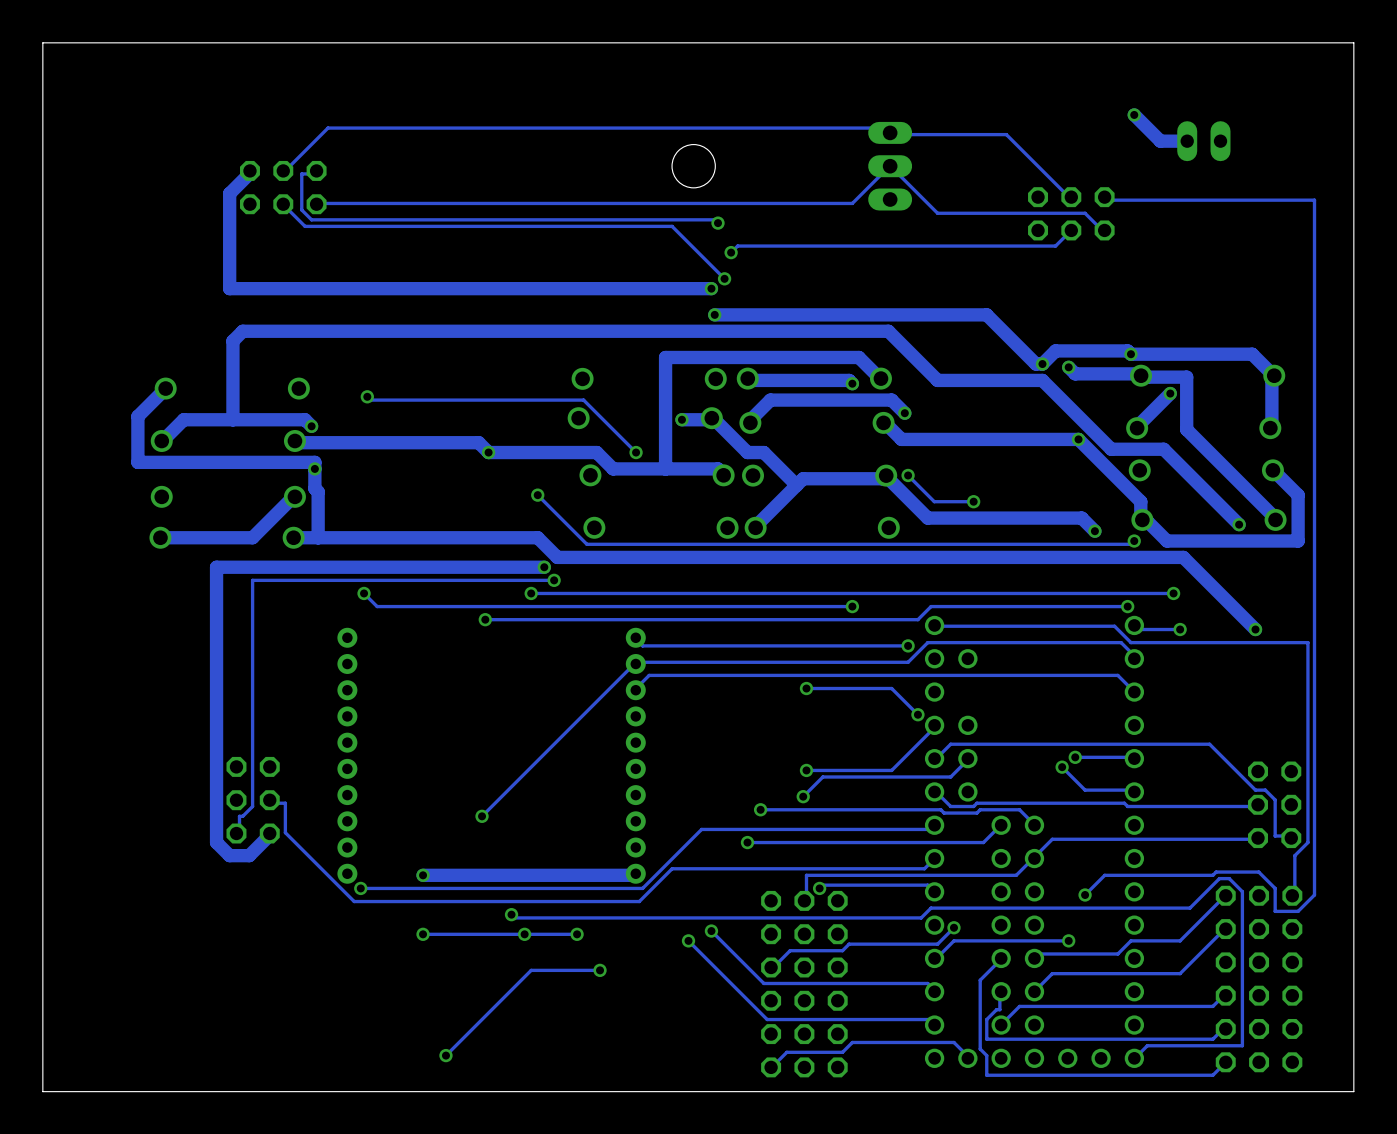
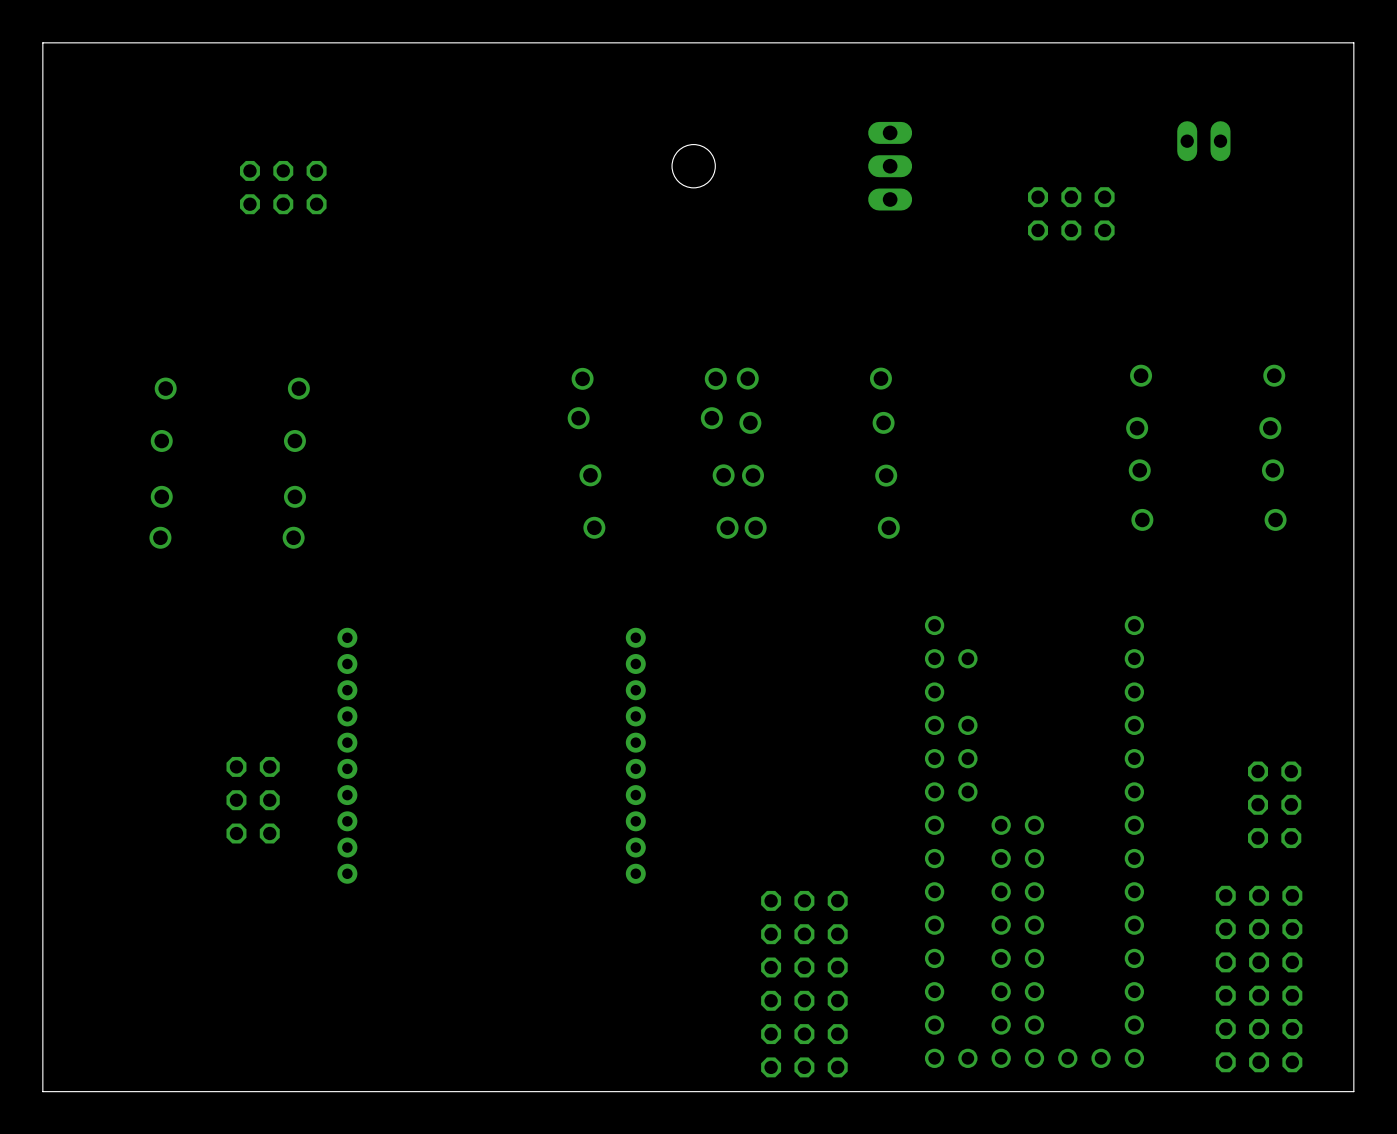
track: (1134, 114) (1160, 141) (1187, 141) -> none
via: (1134, 114) -> none
track: (249, 170) (249, 173) (229, 193) (229, 288) (711, 288) -> none
track: (283, 170) (327, 128) (885, 128) (891, 134) (1006, 134) (1068, 196) (1071, 197) -> none
track: (316, 170) (314, 173) (301, 173) (301, 210) (311, 219) (714, 219) (718, 223) -> none
track: (1104, 197) (1104, 200) (1314, 200) (1314, 894) (1298, 911) (1275, 911) (1275, 888) (1258, 872) (1216, 872) (1212, 875) (1104, 875) (1085, 894) -> none
track: (283, 204) (305, 226) (672, 226) (724, 278) -> none
track: (316, 204) (852, 203) (890, 166) (937, 213) (1085, 213) (1104, 230) -> none
via: (718, 223) -> none
track: (1071, 230) (1055, 246) (737, 246) (731, 252) -> none
via: (731, 252) -> none
via: (724, 278) -> none
via: (711, 288) -> none
track: (714, 314) (986, 314) (1035, 364) (1042, 364) (1055, 350) (1127, 350) (1130, 354) (1252, 354) (1274, 375) (1271, 380) (1271, 426) (1270, 428) -> none
via: (714, 314) -> none
via: (1130, 354) -> none
via: (1042, 364) -> none
track: (1068, 367) (1075, 373) (1140, 373) (1141, 375) (1147, 377) (1186, 377) (1186, 429) (1275, 519) -> none
via: (1068, 367) -> none
track: (747, 378) (750, 380) (849, 380) (852, 383) -> none
track: (880, 378) (858, 357) (665, 357) (665, 468) -> none
via: (852, 383) -> none
track: (165, 388) (137, 416) (137, 462) (314, 462) (314, 488) (318, 491) (318, 537) -> none
track: (1170, 393) (1137, 428) -> none
via: (1170, 393) -> none
track: (367, 396) (370, 400) (583, 400) (636, 452) -> none
via: (367, 396) -> none
track: (904, 413) (891, 400) (770, 400) (750, 419) (750, 422) -> none
via: (904, 413) -> none
track: (232, 419) (232, 341) (242, 331) (888, 331) (937, 380) (1042, 380) (1111, 449) (1163, 449) (1239, 524) -> none
track: (681, 419) (711, 418) (714, 419) (747, 452) (763, 452) (796, 485) -> none
via: (681, 419) -> none
track: (883, 422) (901, 439) (1078, 439) (1140, 501) (1140, 518) (1147, 521) (1167, 541) (1298, 541) (1298, 495) (1272, 470) -> none
track: (311, 426) (305, 419) (183, 419) (161, 440) -> none
via: (311, 426) -> none
via: (1078, 439) -> none
track: (294, 440) (295, 442) (478, 442) (488, 452) (596, 452) (613, 468) (718, 468) (723, 475) -> none
via: (488, 452) -> none
via: (636, 452) -> none
via: (314, 468) -> none
track: (908, 475) (934, 501) (973, 501) -> none
via: (908, 475) -> none
track: (537, 495) (586, 544) (1130, 544) (1134, 541) -> none
via: (537, 495) -> none
track: (294, 496) (252, 537) (160, 537) -> none
via: (973, 501) -> none
via: (1239, 524) -> none
track: (755, 527) (803, 478) (881, 478) (886, 475) (927, 518) (1081, 518) (1094, 531) -> none
via: (1094, 531) -> none
track: (293, 537) (537, 537) (557, 557) (1183, 557) (1255, 629) -> none
via: (1134, 541) -> none
track: (544, 567) (216, 567) (216, 842) (229, 855) (249, 855) (269, 833) -> none
via: (544, 567) -> none
track: (554, 580) (252, 580) (252, 806) (242, 816) (239, 816) (239, 832) (236, 833) -> none
via: (554, 580) -> none
track: (364, 593) (377, 606) (852, 606) -> none
via: (364, 593) -> none
via: (531, 593) -> none
track: (1173, 593) (531, 593) -> none
via: (1173, 593) -> none
via: (852, 606) -> none
track: (1127, 606) (931, 606) (917, 619) (485, 619) -> none
via: (1127, 606) -> none
via: (485, 619) -> none
track: (934, 625) (1114, 626) (1130, 642) (1307, 642) (1307, 842) (1294, 855) (1294, 894) (1292, 895) -> none
track: (1134, 625) (1140, 629) (1180, 629) -> none
via: (1180, 629) -> none
via: (1255, 629) -> none
track: (635, 637) (642, 645) (908, 645) -> none
via: (908, 645) -> none
track: (1134, 658) (1134, 655) (1121, 642) (927, 642) (908, 662) (636, 662) (482, 816) -> none
track: (806, 688) (891, 688) (917, 714) -> none
via: (806, 688) -> none
track: (635, 690) (649, 675) (1117, 675) (1134, 692) -> none
via: (917, 714) -> none
track: (934, 725) (934, 727) (891, 770) (806, 770) -> none
track: (1075, 757) (1134, 758) -> none
via: (1075, 757) -> none
track: (934, 758) (950, 744) (1209, 744) (1255, 790) (1265, 790) (1275, 799) (1275, 836) (1288, 836) (1291, 838) -> none
track: (967, 758) (950, 777) (822, 777) (803, 796) -> none
track: (1062, 767) (1085, 790) (1134, 790) (1134, 791) -> none
via: (1062, 767) -> none
via: (806, 770) -> none
track: (934, 791) (950, 806) (973, 806) (976, 803) (1124, 803) (1127, 806) (1255, 806) (1258, 804) -> none
via: (803, 796) -> none
track: (269, 800) (272, 803) (285, 803) (285, 832) (354, 901) (639, 901) (672, 868) (924, 868) (934, 858) -> none
track: (760, 809) (940, 809) (944, 813) (976, 813) (980, 809) (1019, 809) (1034, 825) -> none
via: (760, 809) -> none
via: (482, 816) -> none
track: (934, 825) (931, 829) (701, 829) (642, 888) (360, 888) -> none
track: (1001, 825) (983, 842) (747, 842) -> none
track: (1258, 838) (1052, 839) (1016, 875) (806, 875) (806, 898) (804, 900) -> none
via: (747, 842) -> none
track: (635, 873) (632, 875) (423, 875) -> none
via: (423, 875) -> none
via: (360, 888) -> none
track: (819, 888) (822, 885) (927, 885) (934, 891) -> none
via: (819, 888) -> none
via: (1085, 894) -> none
track: (1225, 895) (1180, 940) (1130, 940) (1117, 953) (1039, 953) (1034, 958) -> none
track: (511, 914) (514, 917) (921, 917) (931, 908) (1189, 908) (1219, 878) (1229, 878) (1242, 891) (1242, 1045) (1147, 1045) (1134, 1058) -> none
via: (511, 914) -> none
track: (953, 927) (937, 944) (849, 944) (842, 950) (790, 950) (771, 967) -> none
via: (953, 927) -> none
track: (1225, 929) (1180, 973) (1052, 973) (1034, 991) -> none
track: (711, 931) (763, 983) (927, 983) (934, 991) -> none
via: (711, 931) -> none
via: (423, 934) -> none
via: (524, 934) -> none
track: (577, 934) (423, 934) -> none
via: (577, 934) -> none
track: (688, 940) (767, 1019) (931, 1019) (934, 1025) -> none
via: (688, 940) -> none
track: (1068, 940) (953, 940) (934, 958) -> none
via: (1068, 940) -> none
track: (1001, 958) (980, 980) (980, 1049) (986, 1055) (986, 1075) (1212, 1075) (1225, 1062) -> none
track: (600, 970) (531, 970) (445, 1055) -> none
via: (600, 970) -> none
track: (1001, 991) (999, 1009) (996, 1009) (986, 1019) (986, 1039) (1212, 1039) (1222, 1029) (1225, 1028) -> none
track: (1225, 995) (1212, 1006) (1019, 1006) (1001, 1025) -> none
via: (445, 1055) -> none
track: (967, 1058) (953, 1042) (852, 1042) (842, 1052) (786, 1052) (771, 1067) -> none

